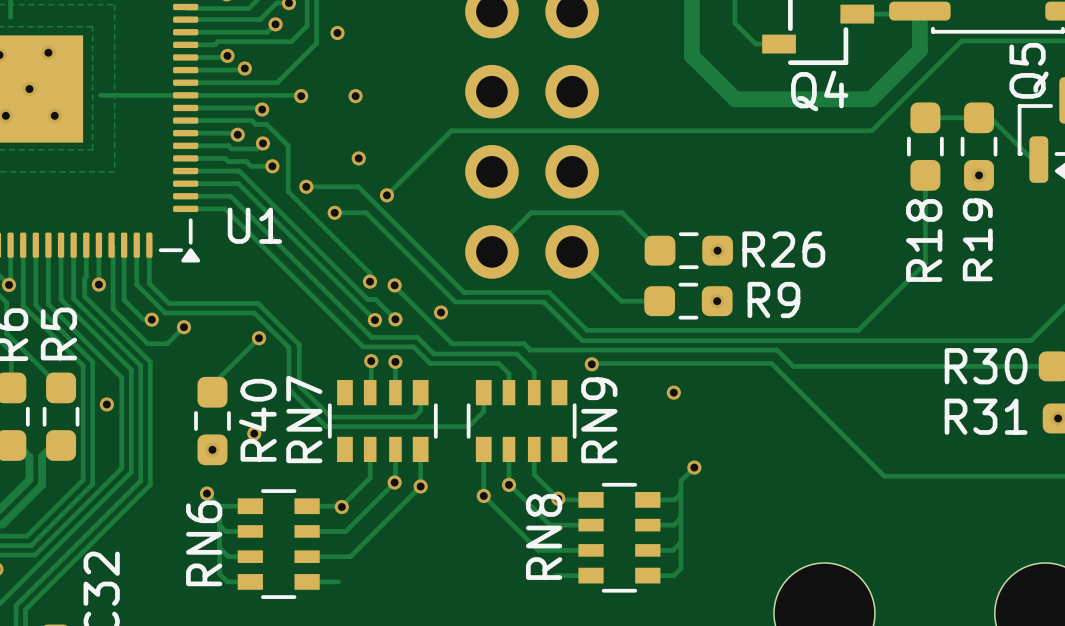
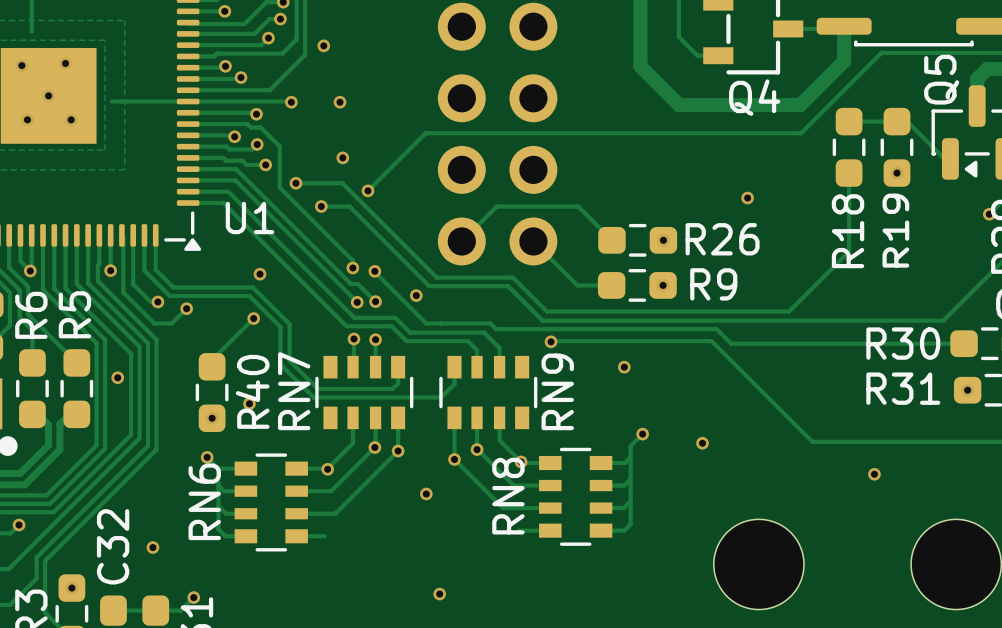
via: none -> (747, 198)
via: none -> (260, 274)
via: none -> (702, 443)
via: none -> (874, 474)
via: none -> (426, 493)
via: none -> (152, 547)

